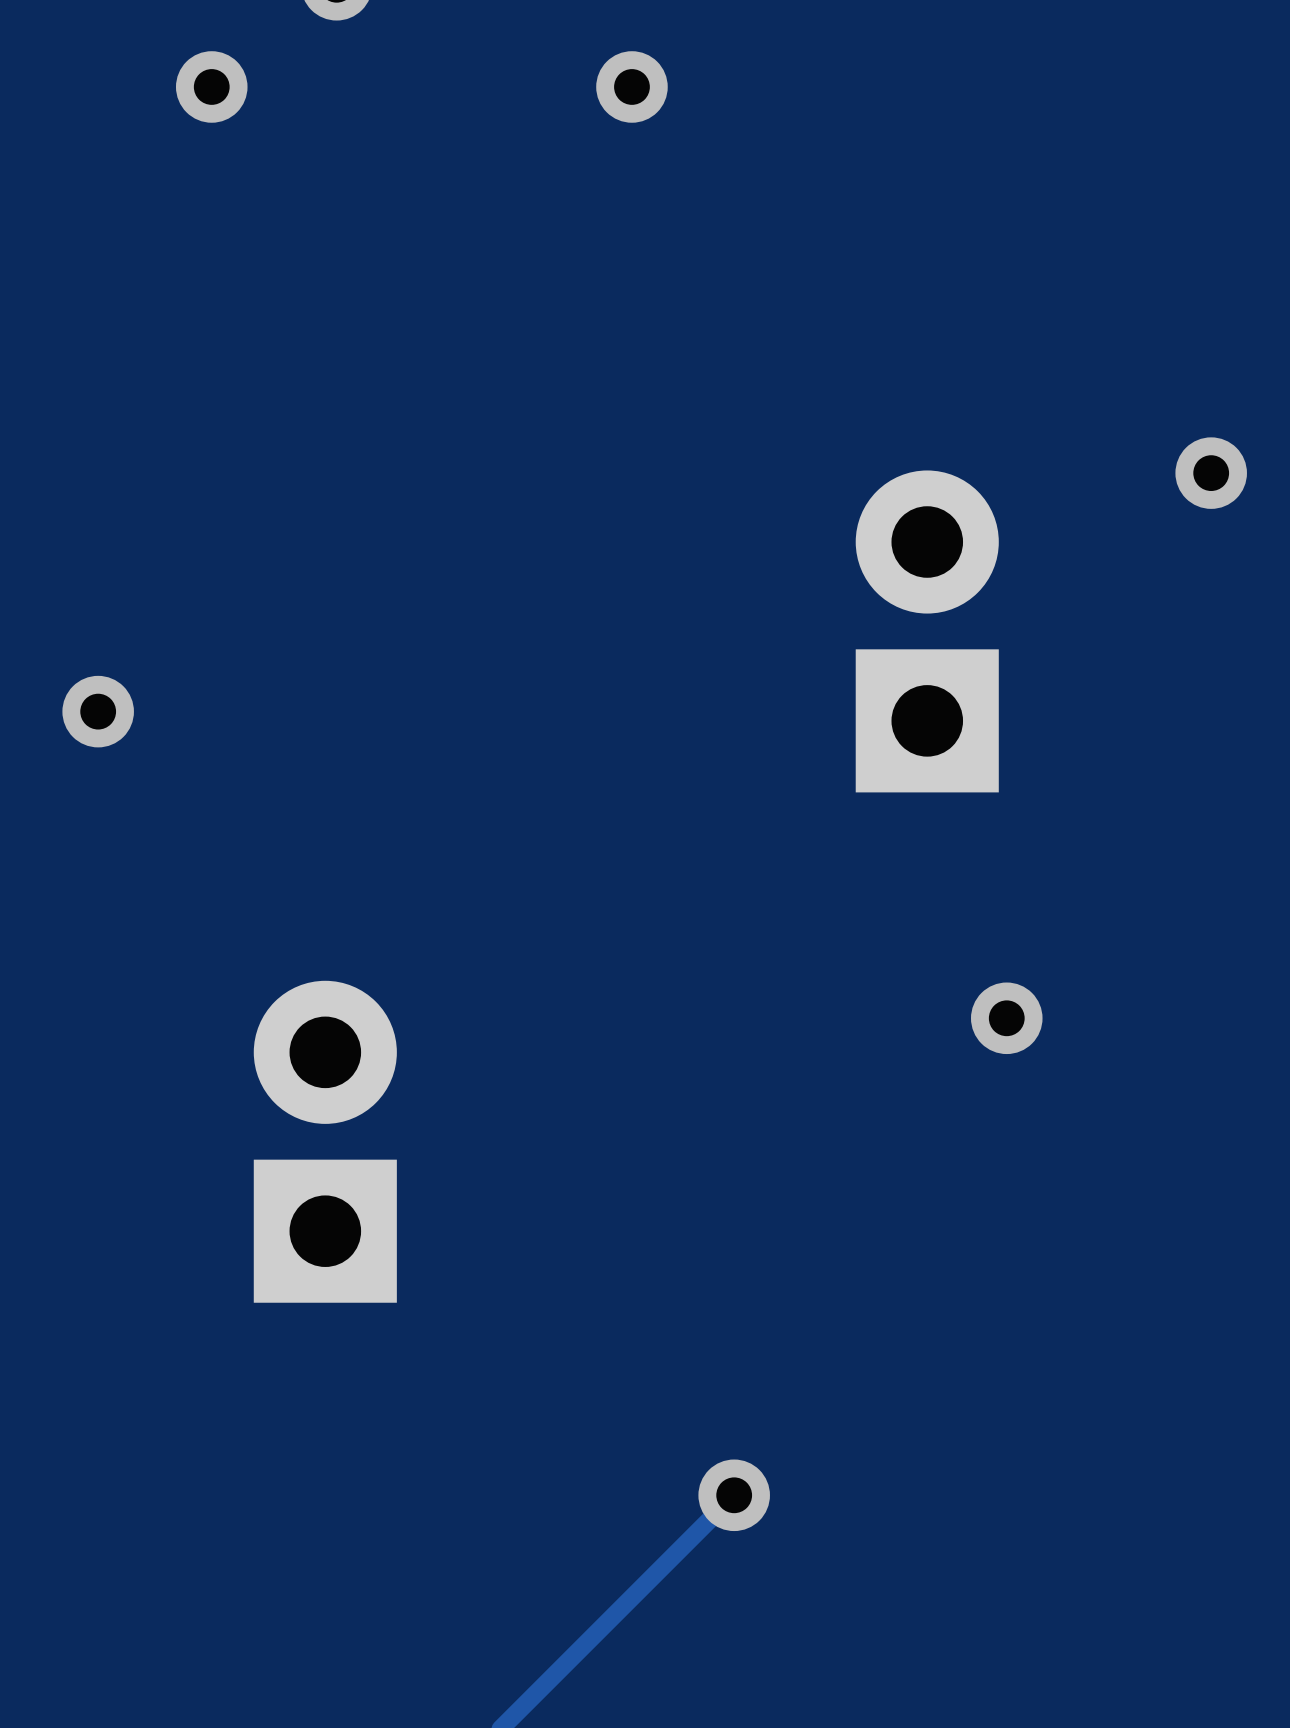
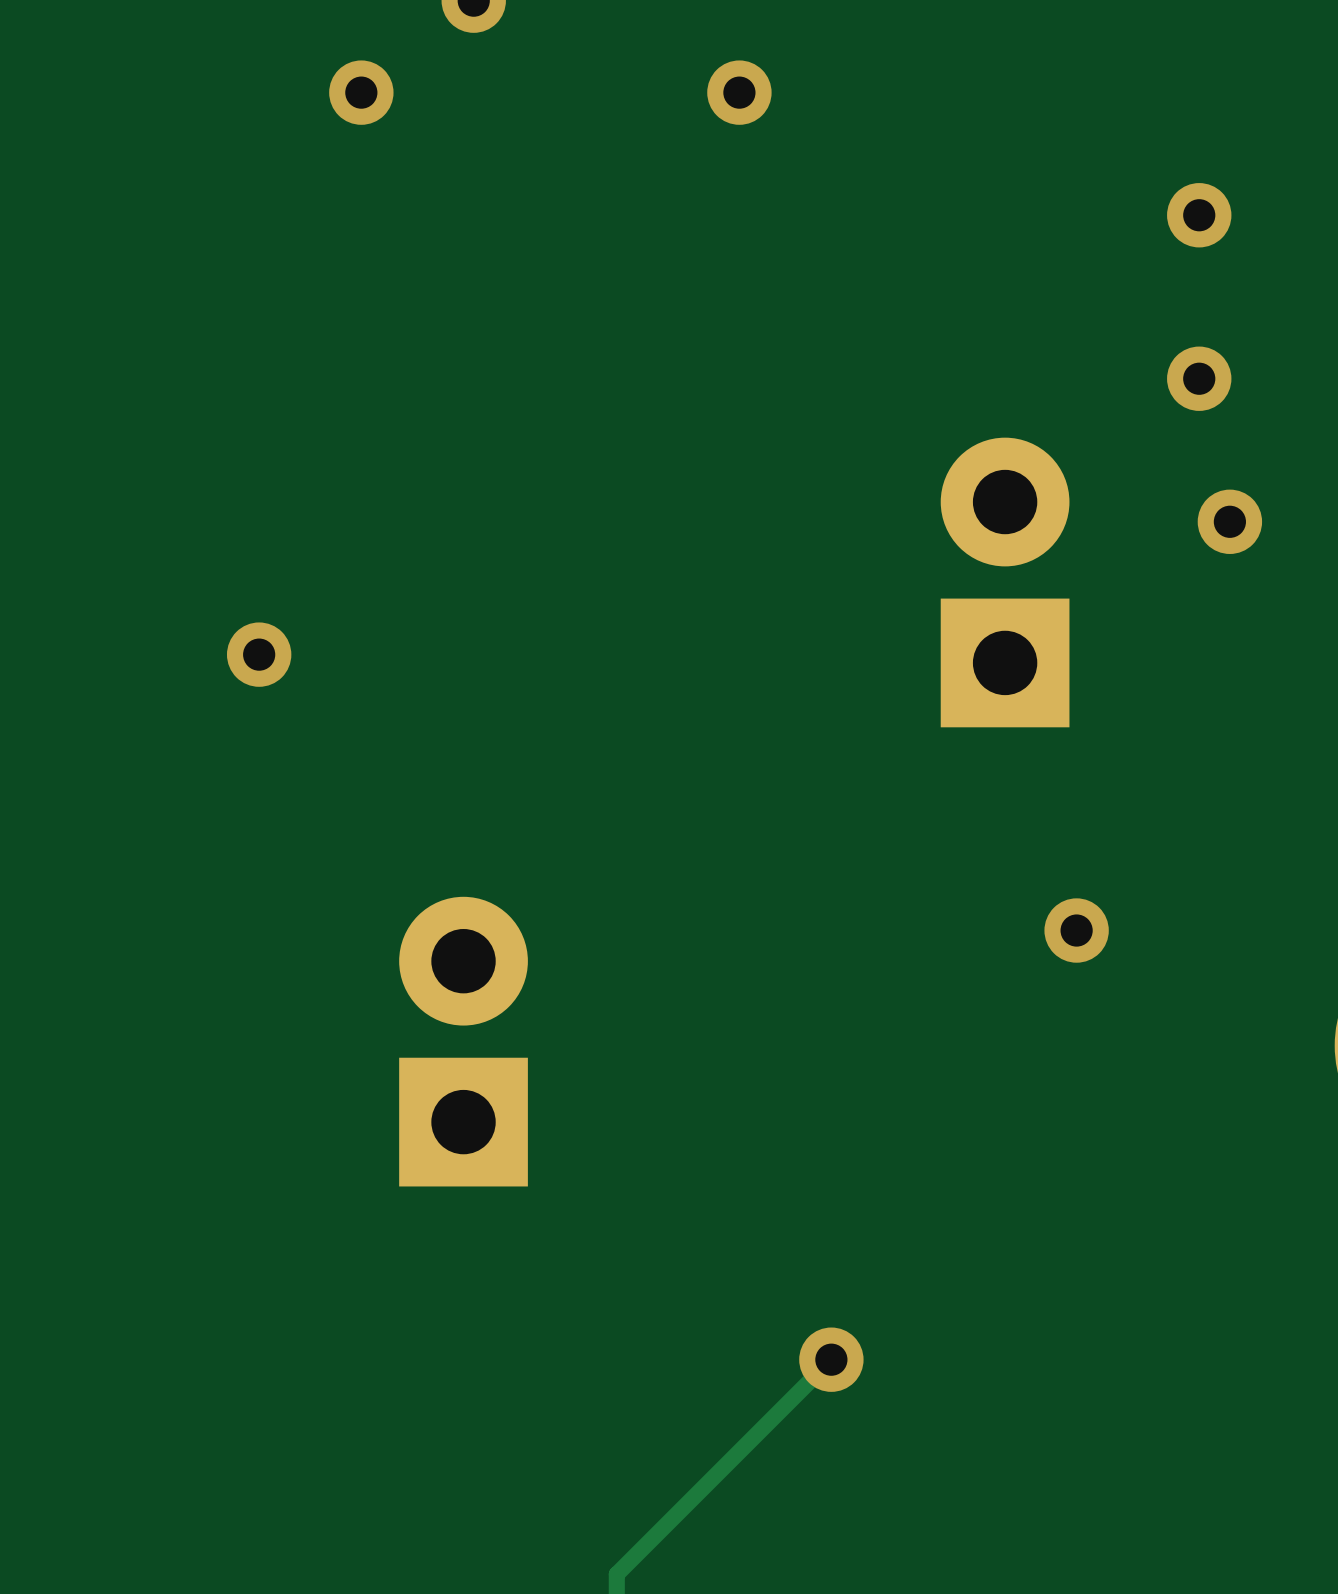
via: none -> (1199, 215)
via: none -> (1199, 378)
via: (1211, 473) -> none
via: none -> (1229, 521)

